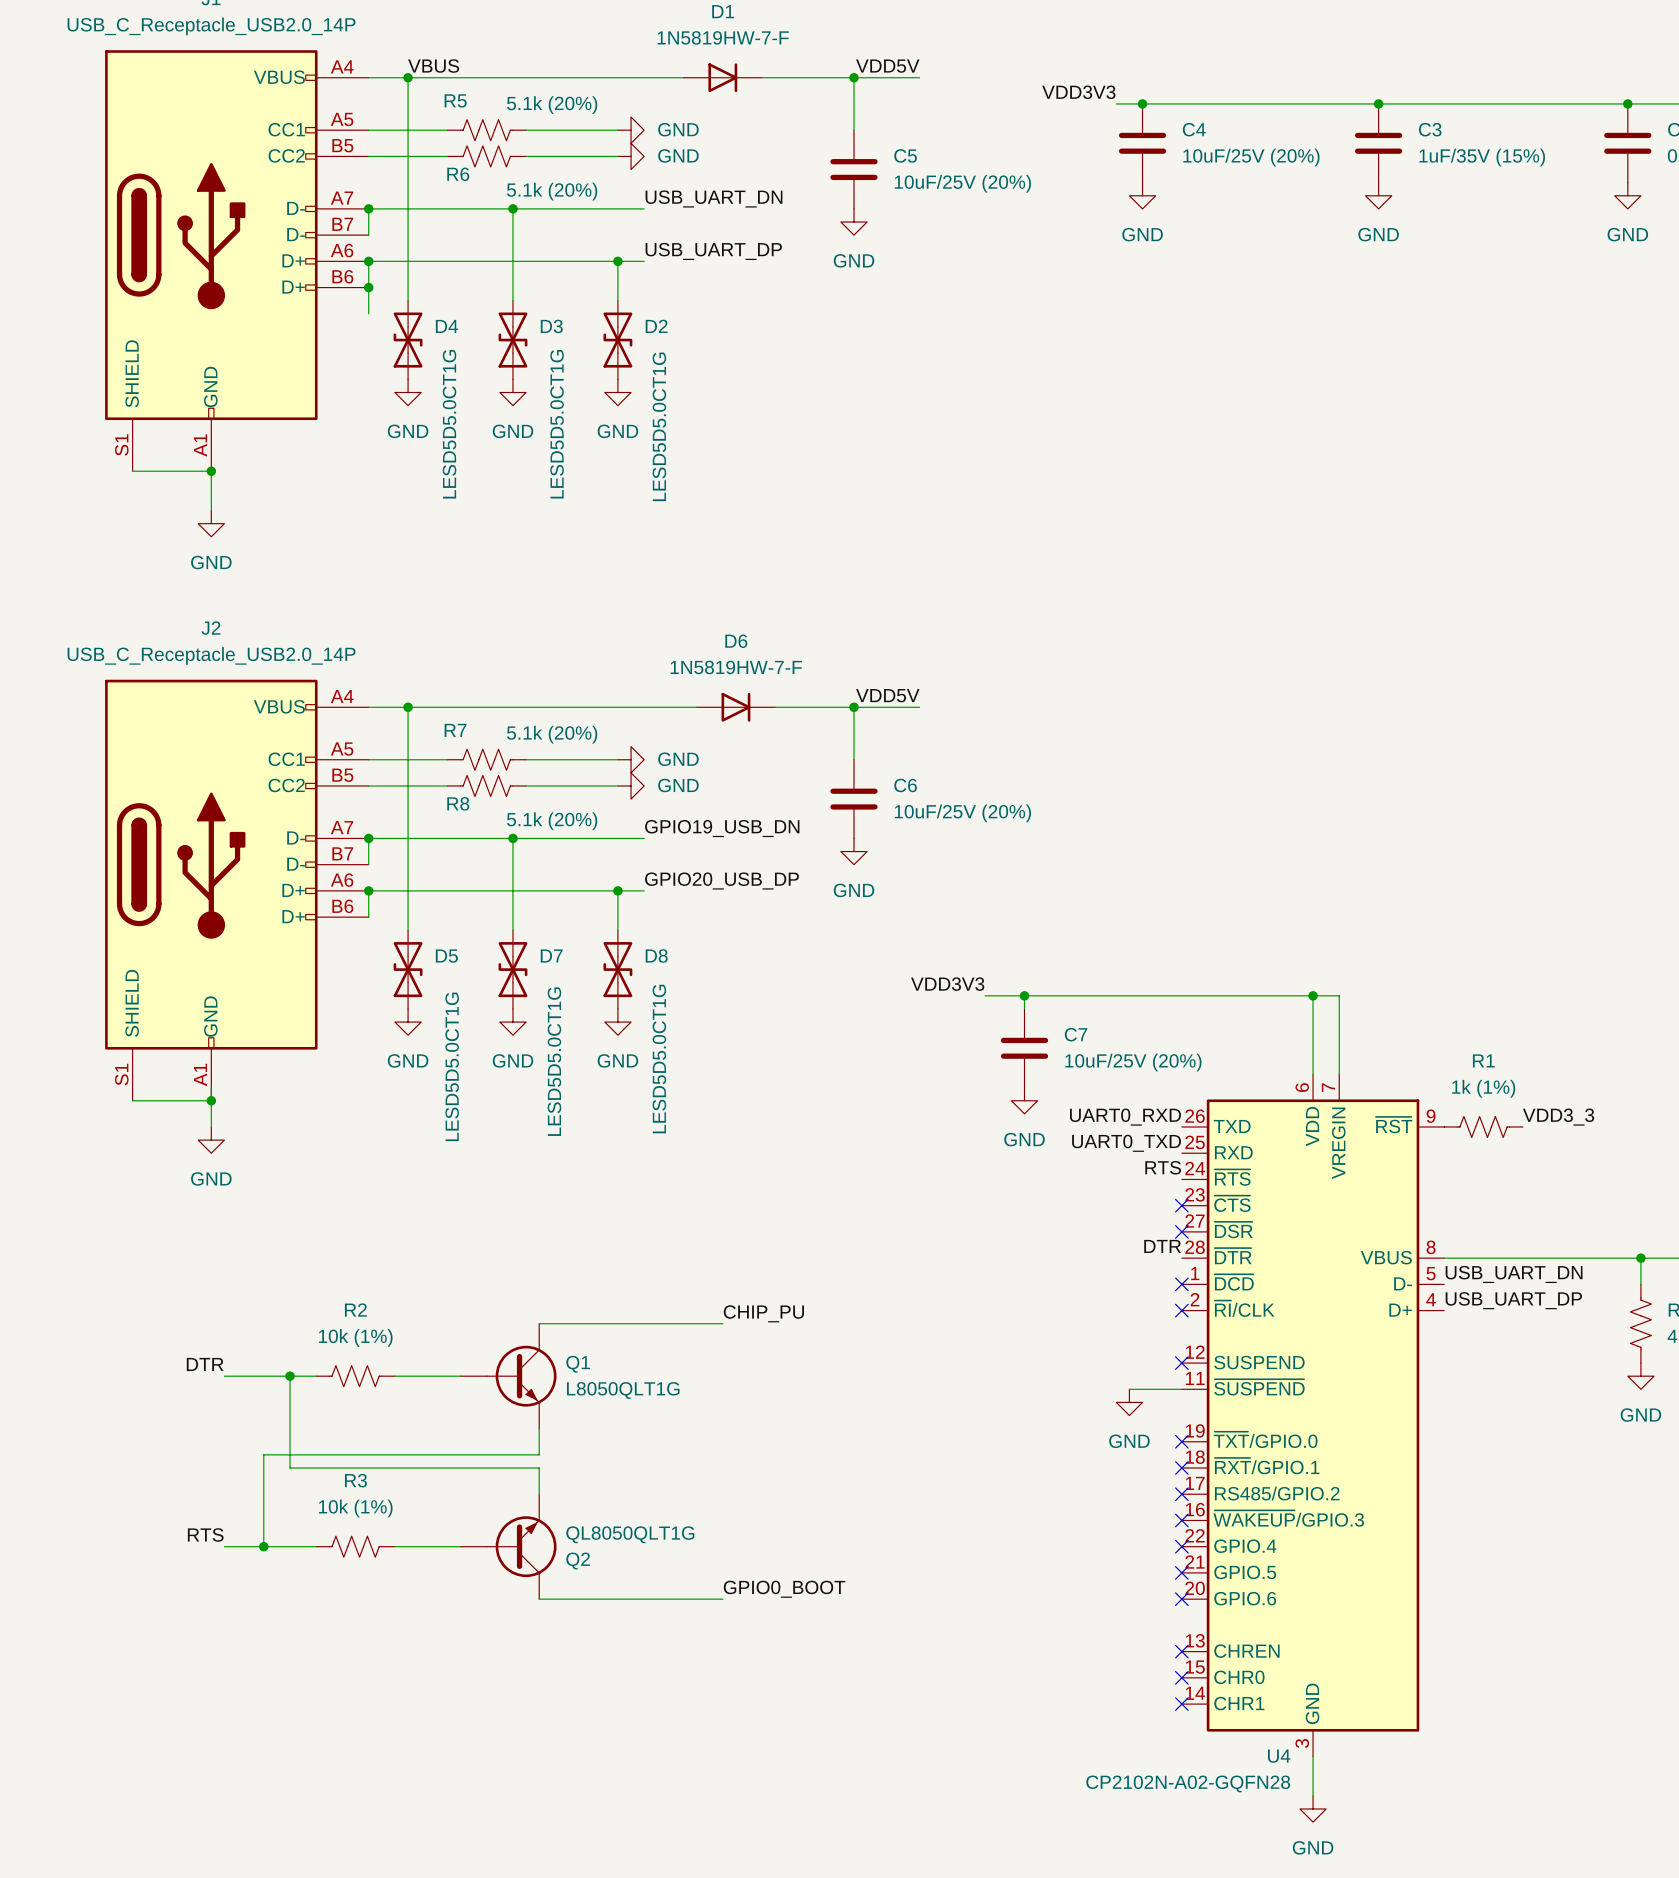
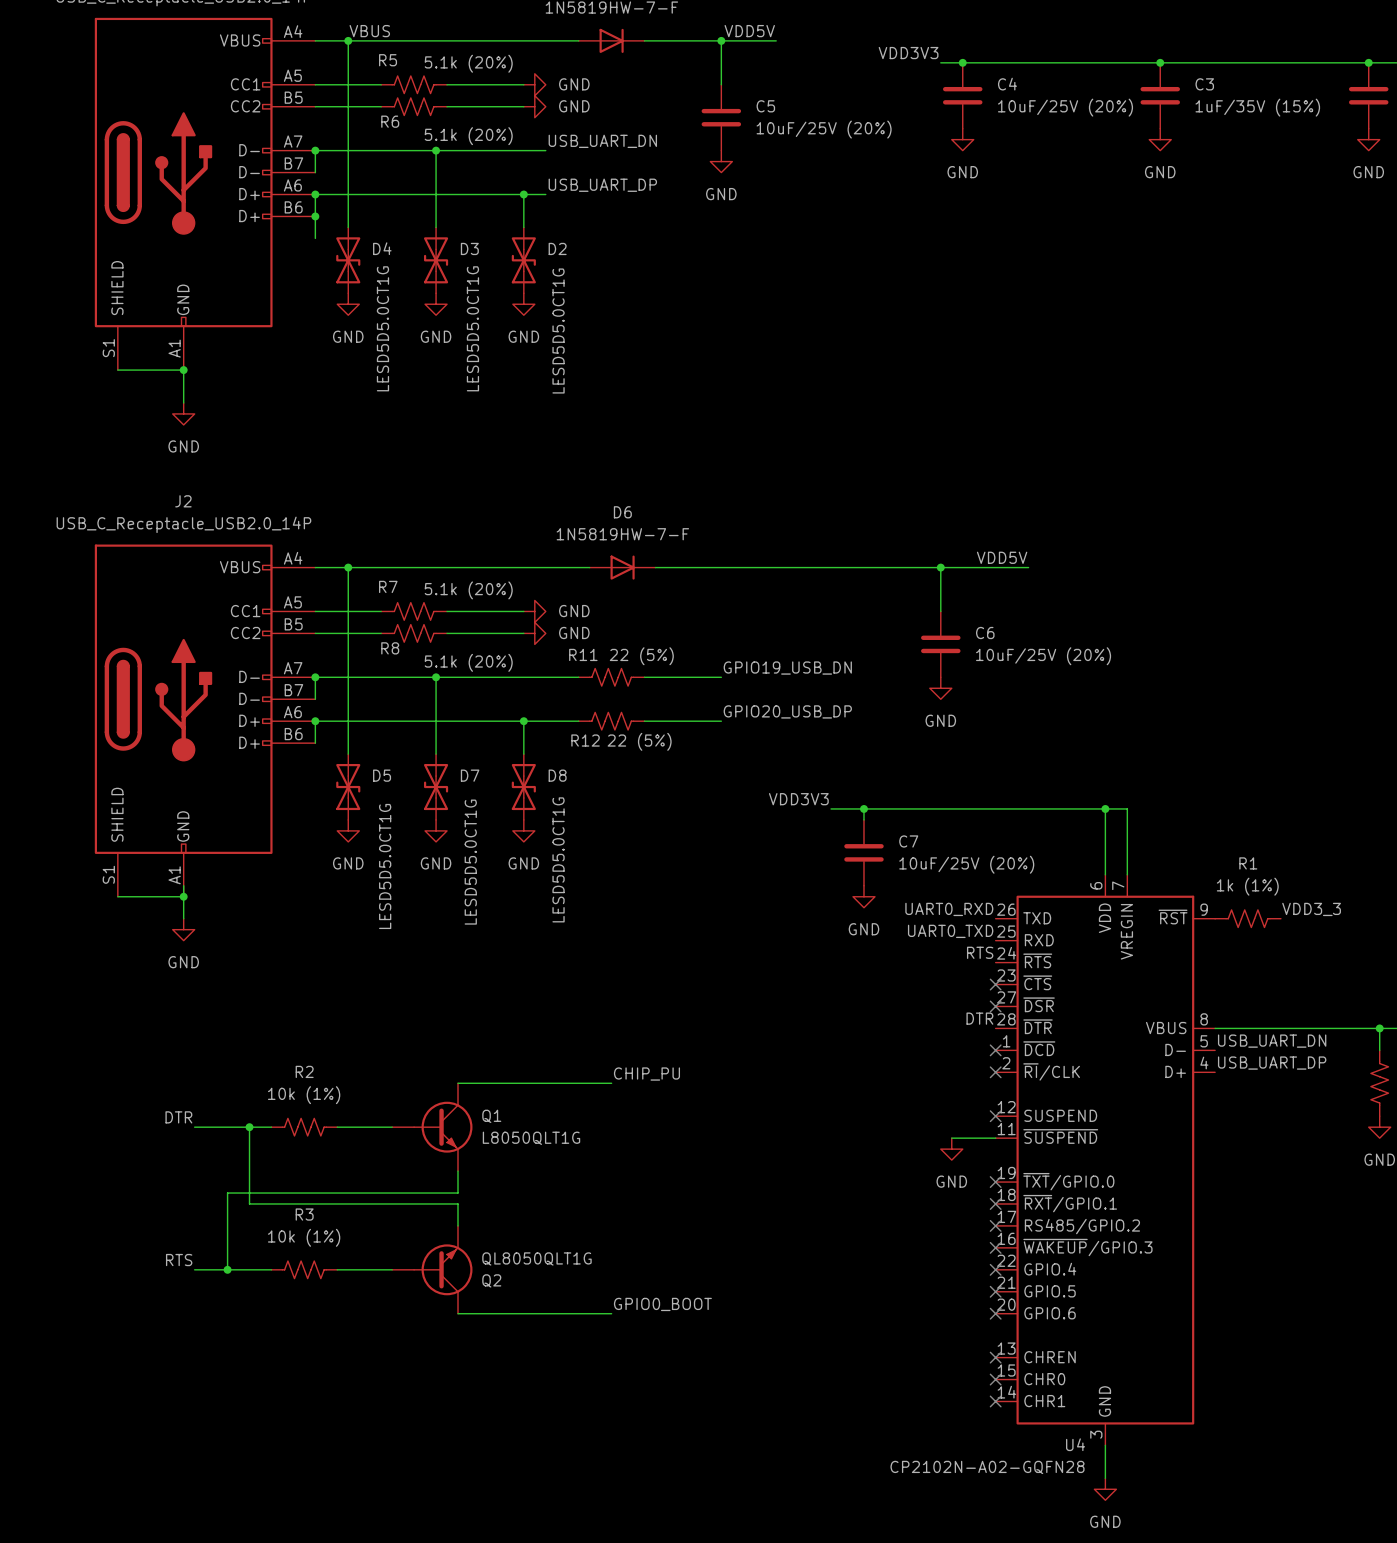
label: VDD5V (887, 695) -> none
label: none -> VDD5V (1002, 557)
wire: (853, 707) (853, 759) -> none
junction: (853, 707) -> none
wire: none -> (776, 567) (1028, 567)
wire: none -> (940, 567) (940, 611)
junction: none -> (940, 567)
C6 position: (853, 799) -> (940, 644)
label position: GPIO19_USB_DN (722, 828) -> GPIO19_USB_DN (787, 668)
wire: none -> (545, 677) (578, 677)
R11: none -> 22 (5%) (611, 677)
wire: none -> (644, 677) (721, 677)
power symbol: GND (853, 851) -> none
power symbol: none -> GND (940, 688)
label position: GPIO20_USB_DP (722, 881) -> GPIO20_USB_DP (787, 711)
wire: none -> (545, 721) (578, 721)
R12: none -> 22 (5%) (611, 721)
wire: none -> (644, 721) (721, 721)

